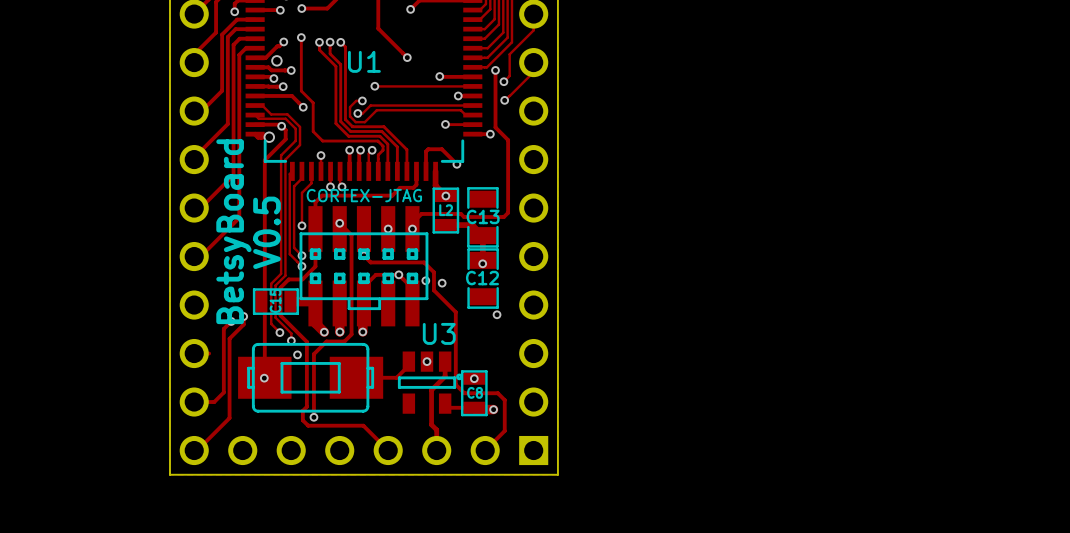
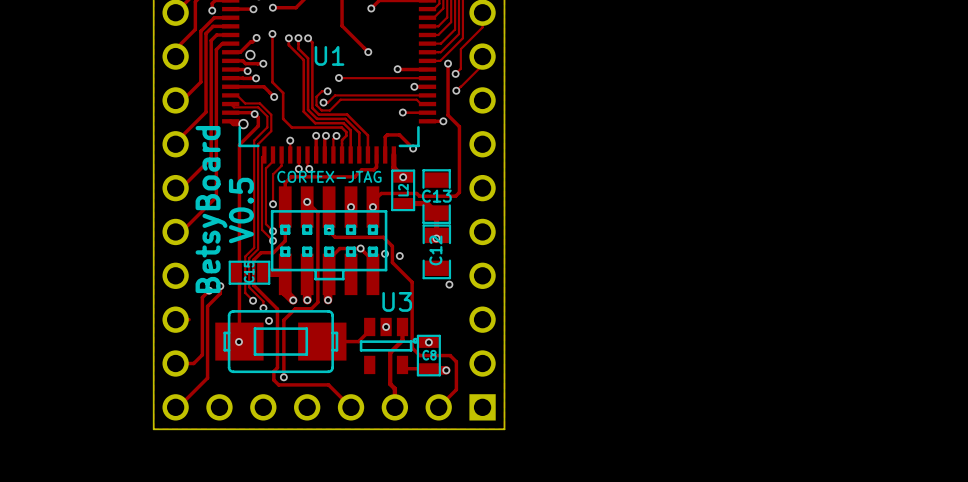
L2 name rotation: 0° (446, 210) -> 90° counterclockwise (403, 190)
C12 name rotation: 0° (482, 278) -> 90° counterclockwise (435, 250)

